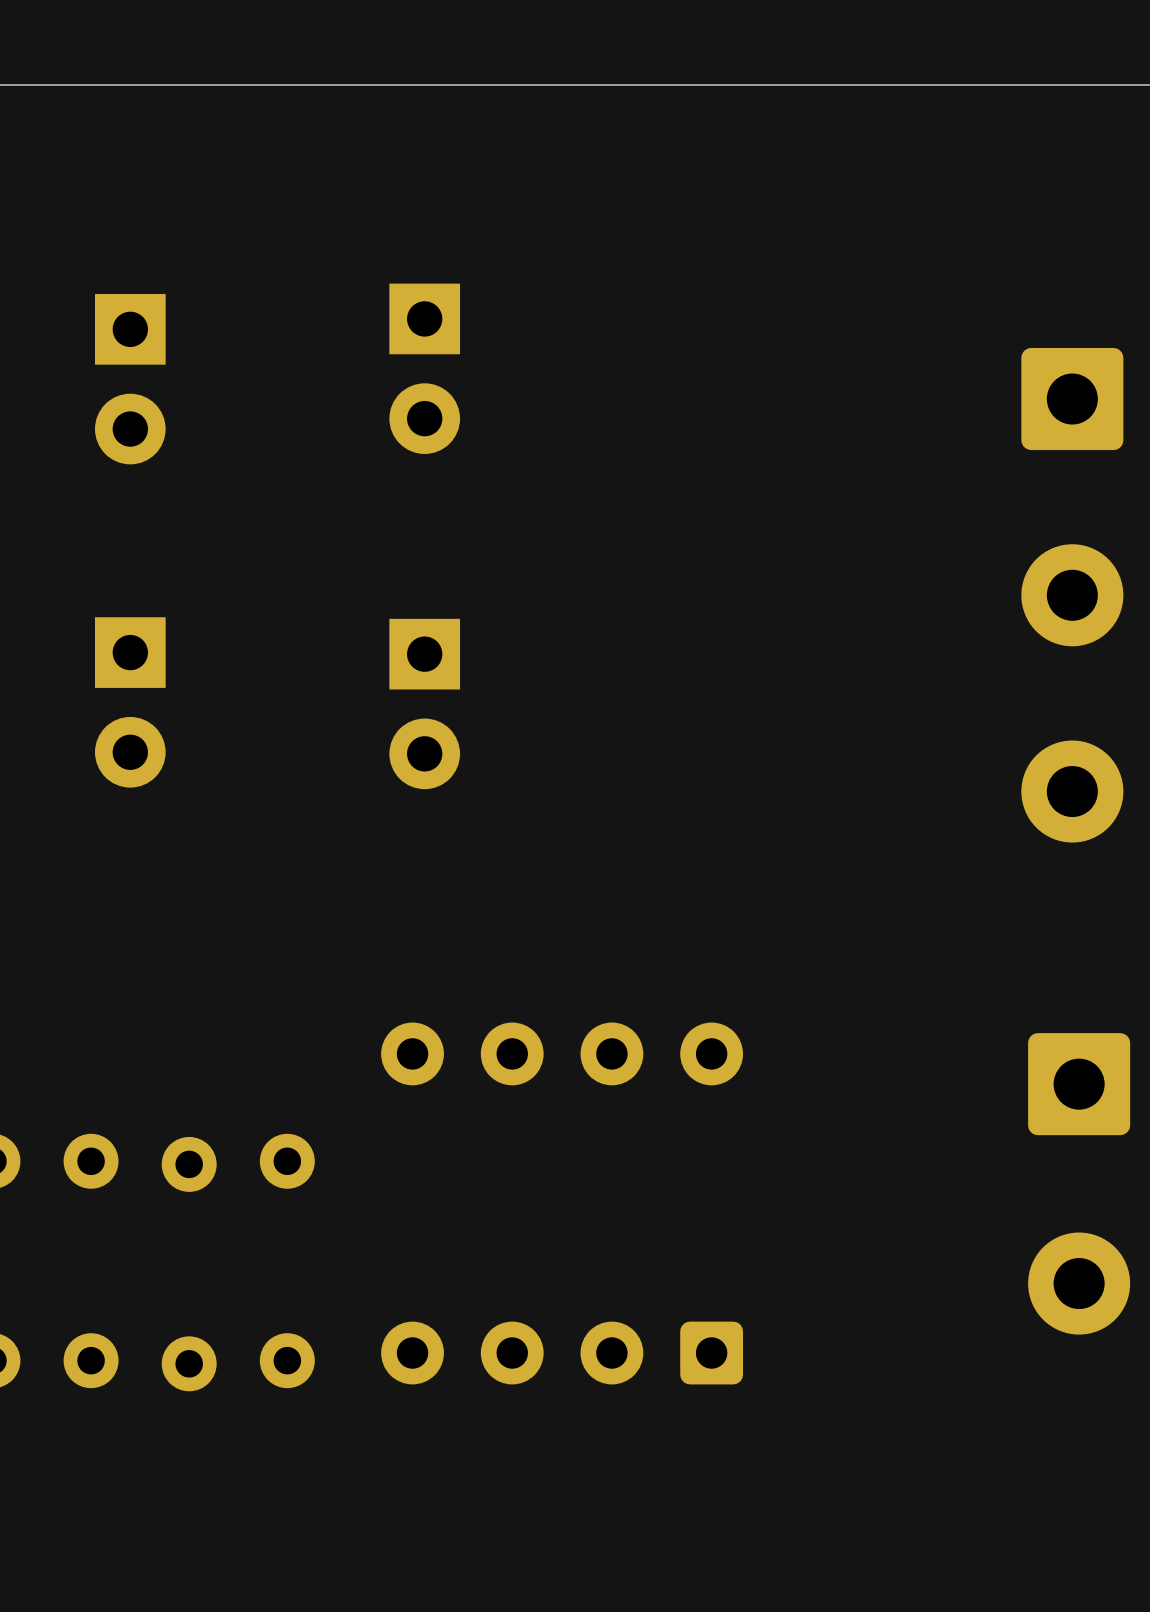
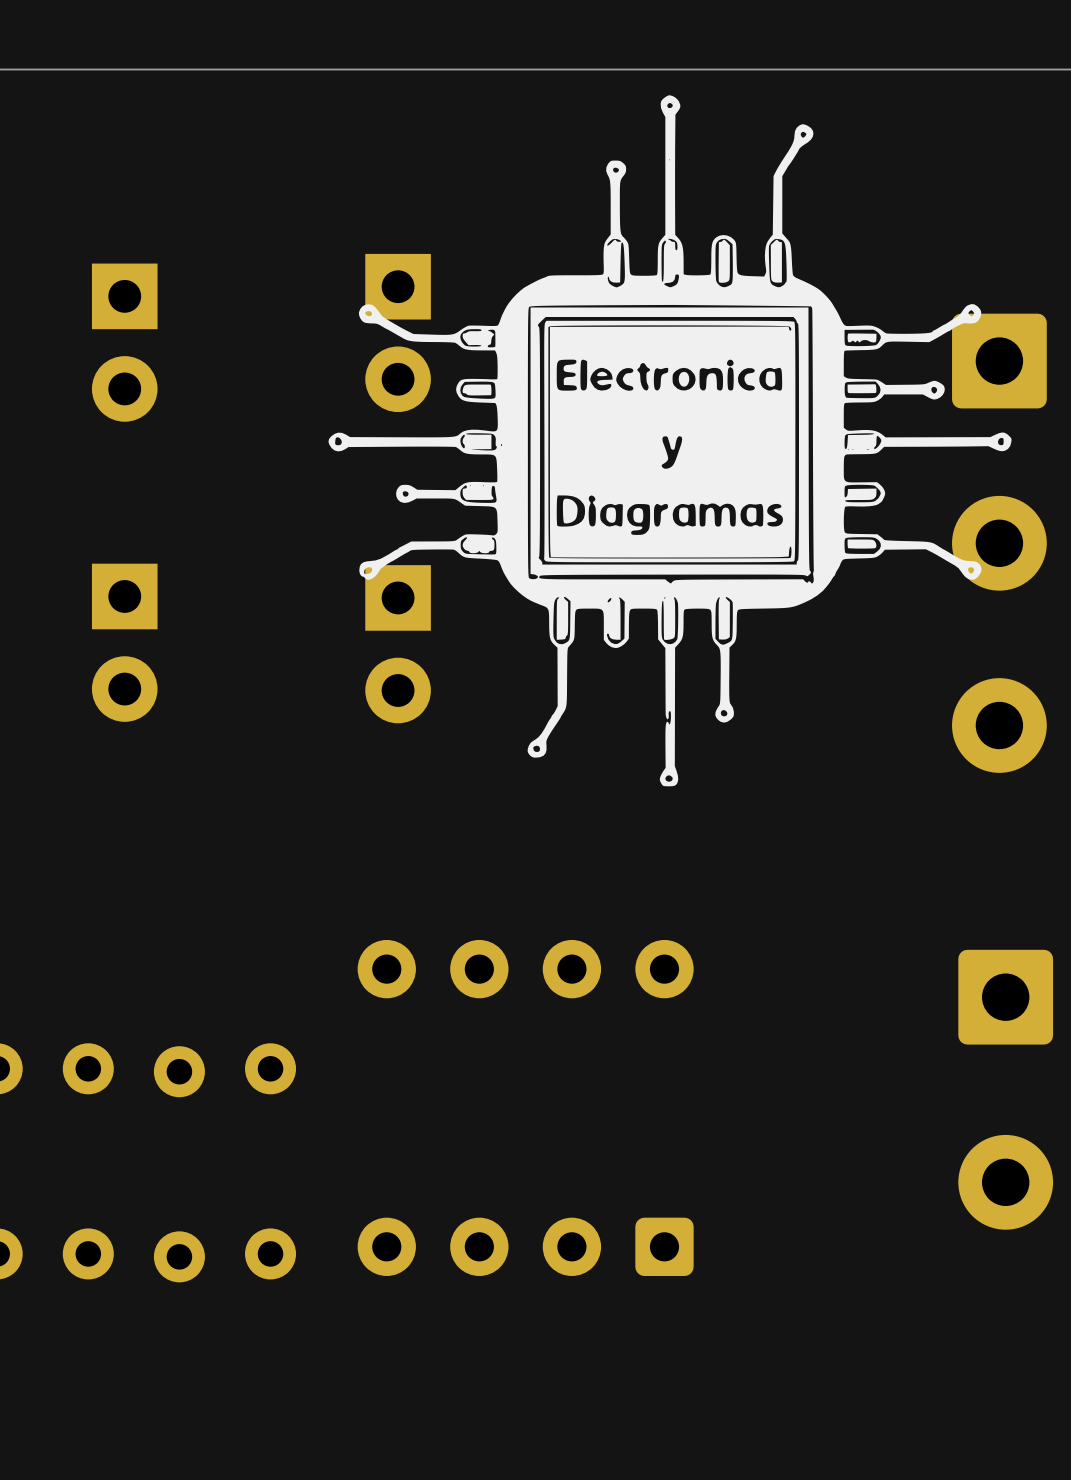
drawing: none -> [328, 95, 1012, 787]

